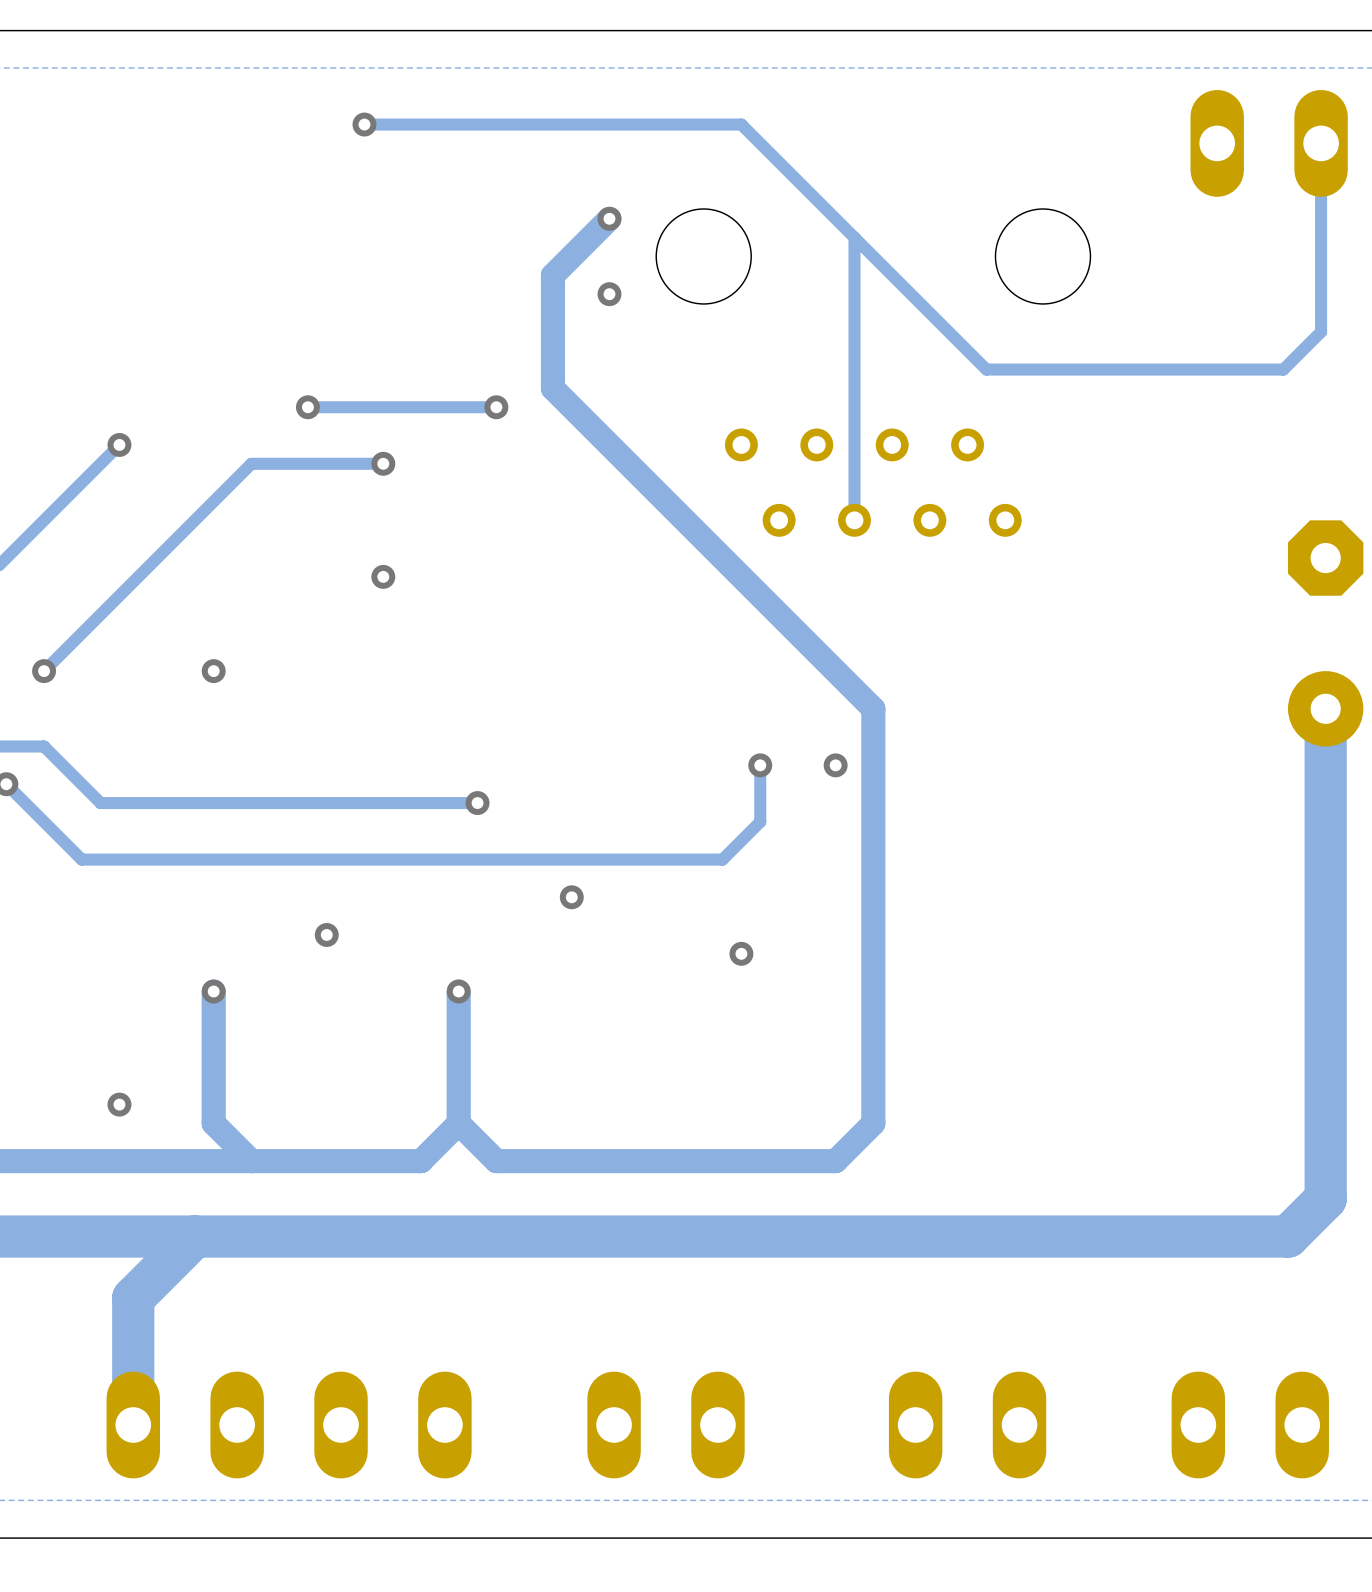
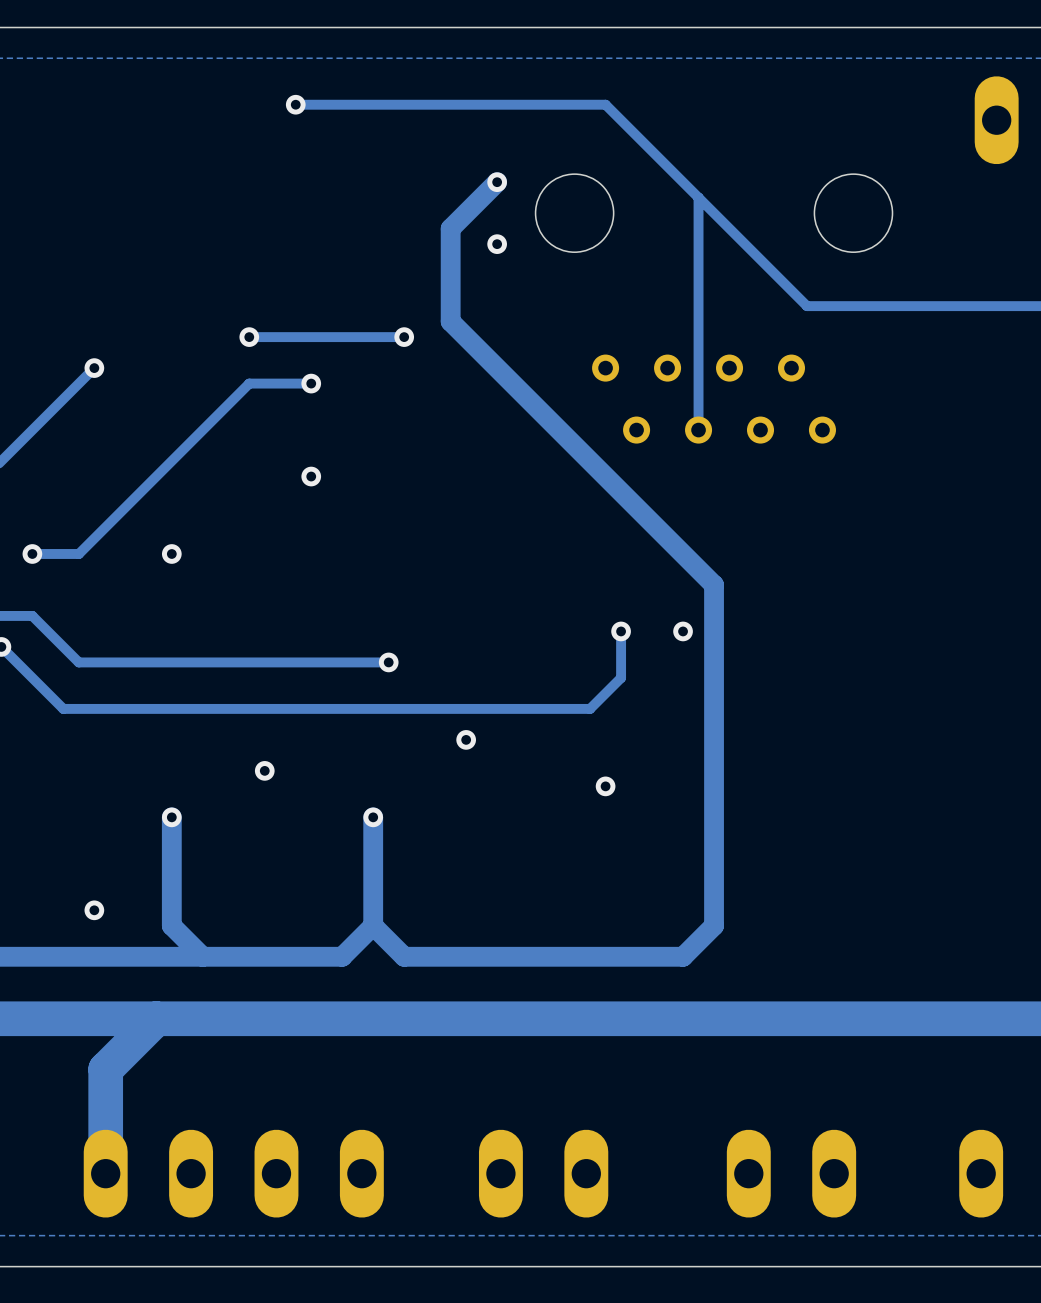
track: (307, 463) (251, 463) (44, 671) -> (249, 383) (78, 553) (32, 553)

